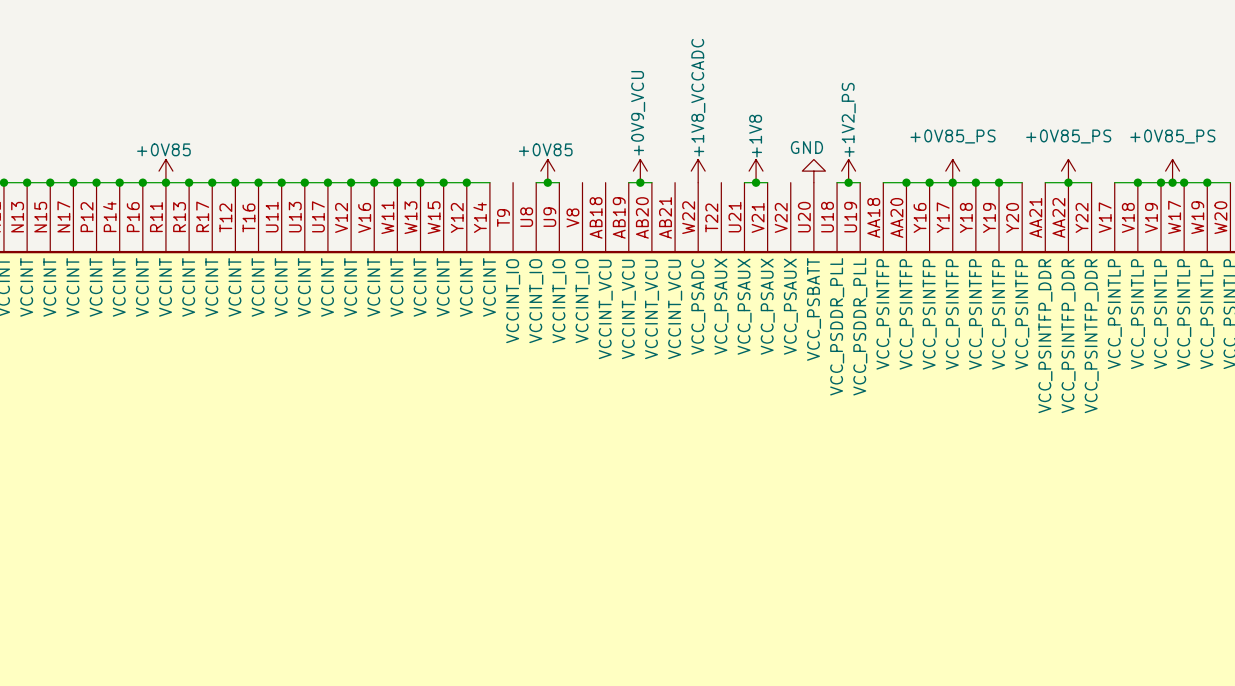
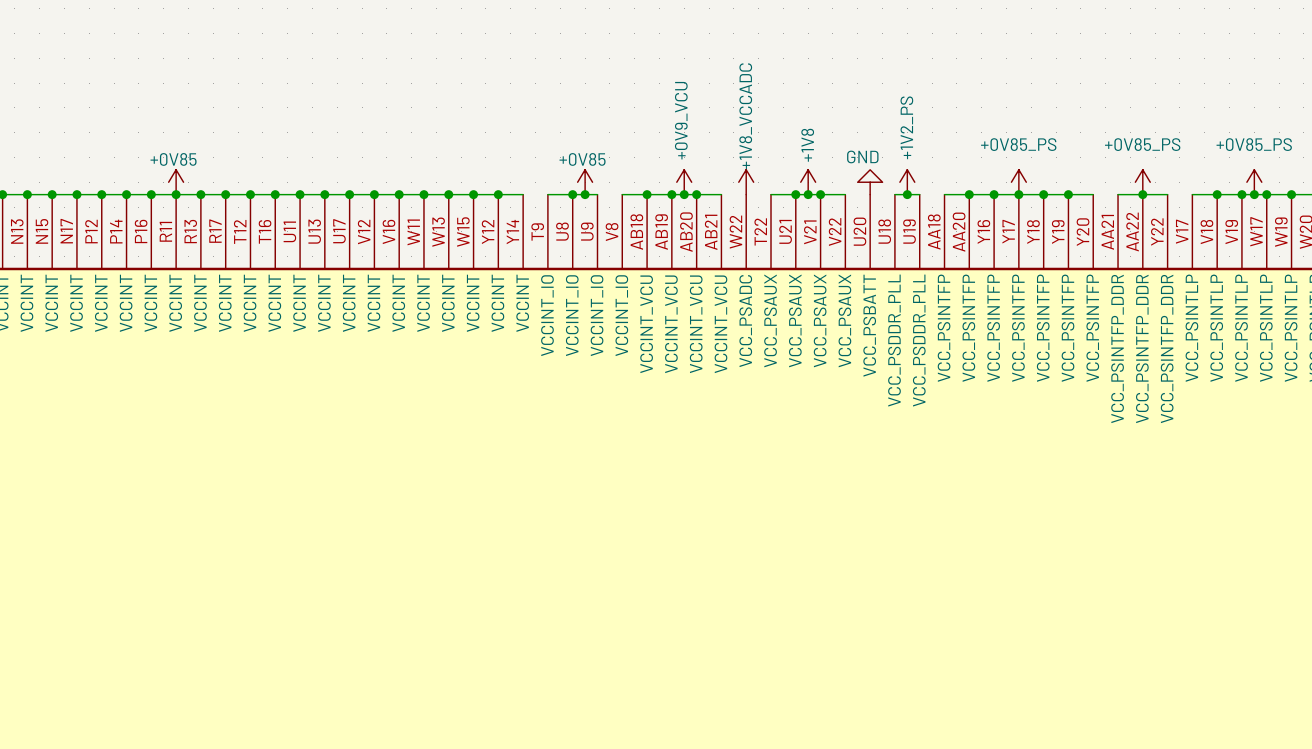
wire: none -> (547, 194) (572, 194)
junction: none -> (572, 194)
wire: none -> (622, 194) (671, 194)
junction: none -> (647, 194)
junction: none -> (671, 194)
wire: none -> (696, 194) (721, 194)
junction: none -> (696, 194)
wire: none -> (771, 194) (795, 194)
junction: none -> (795, 194)
wire: none -> (820, 194) (845, 194)
junction: none -> (820, 194)

